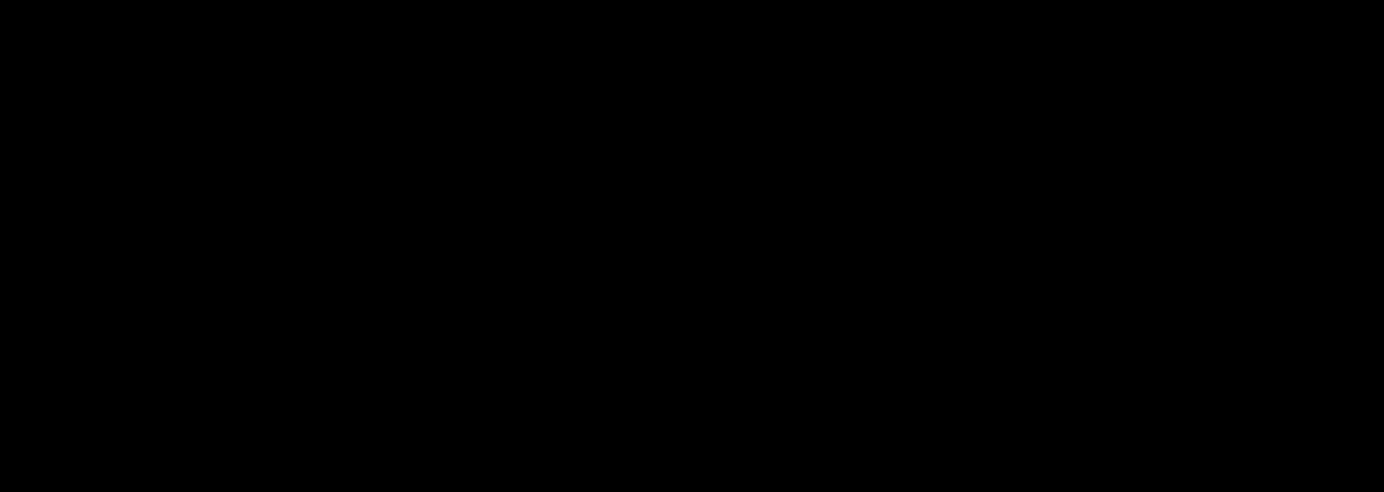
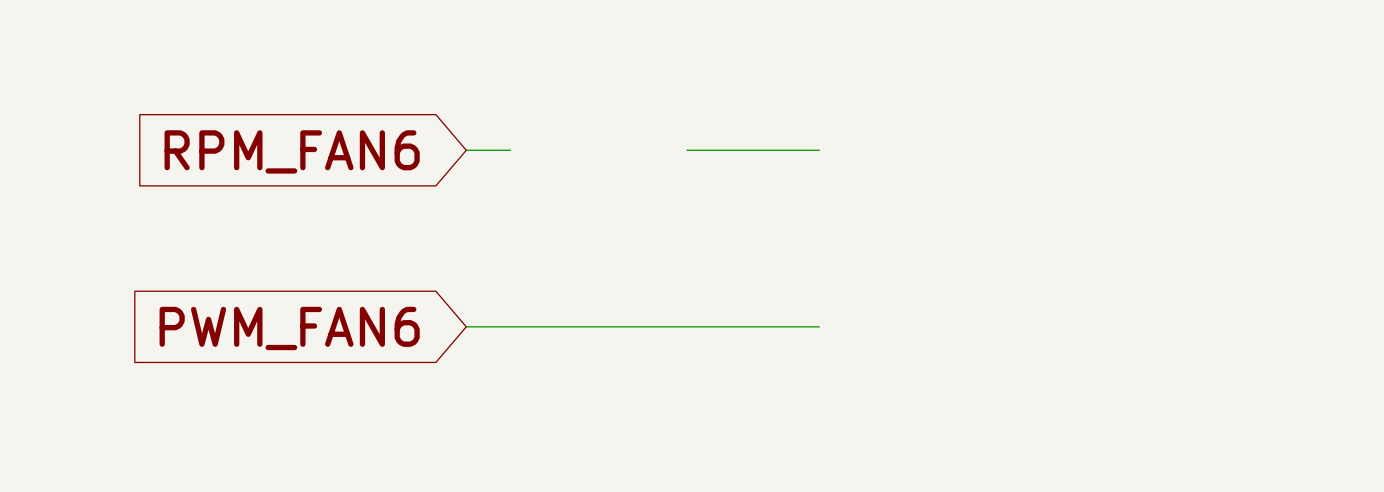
global label: none -> RPM_FAN6 (292, 151)
wire: none -> (466, 150) (510, 150)
wire: none -> (686, 150) (819, 150)
global label: none -> PWM_FAN6 (289, 328)
wire: none -> (466, 326) (819, 326)

